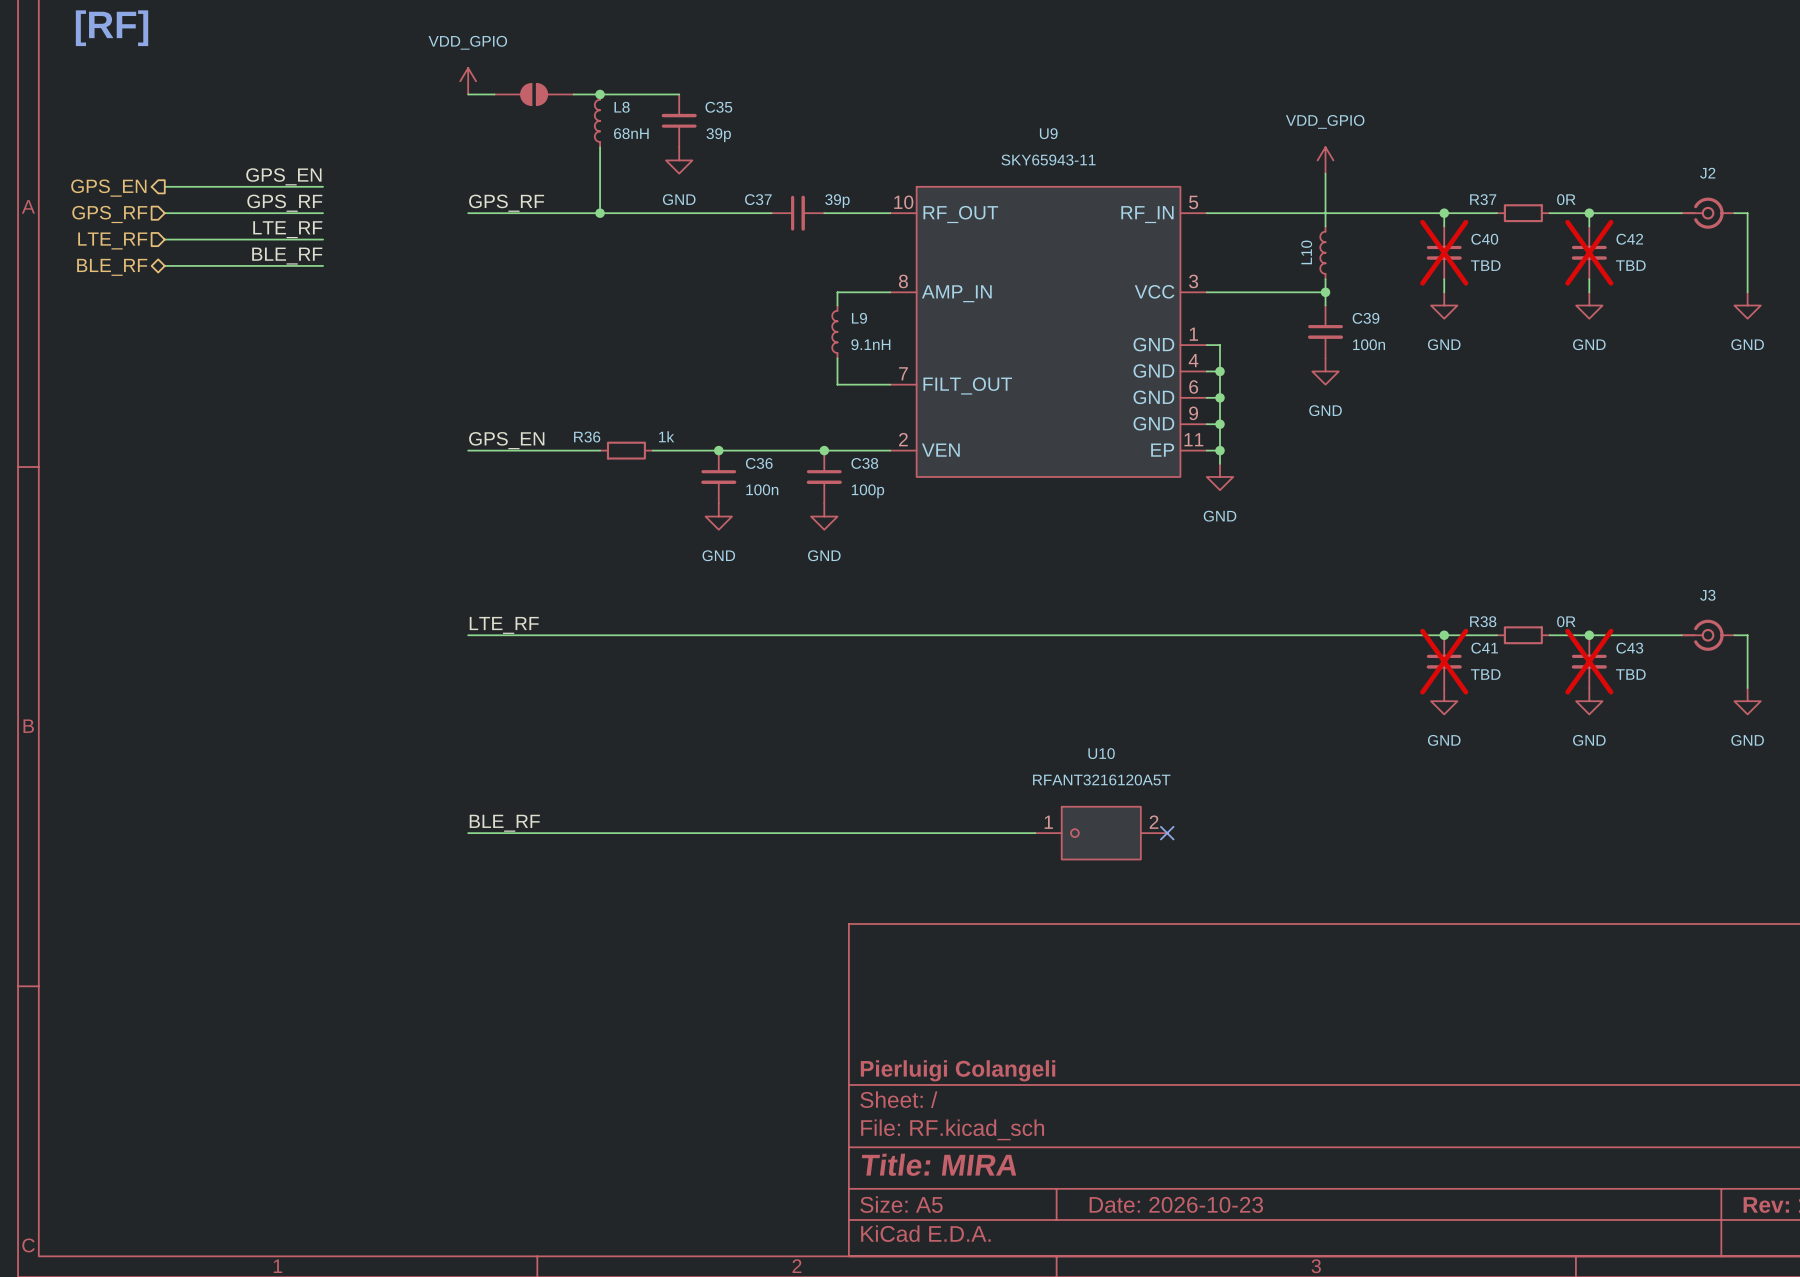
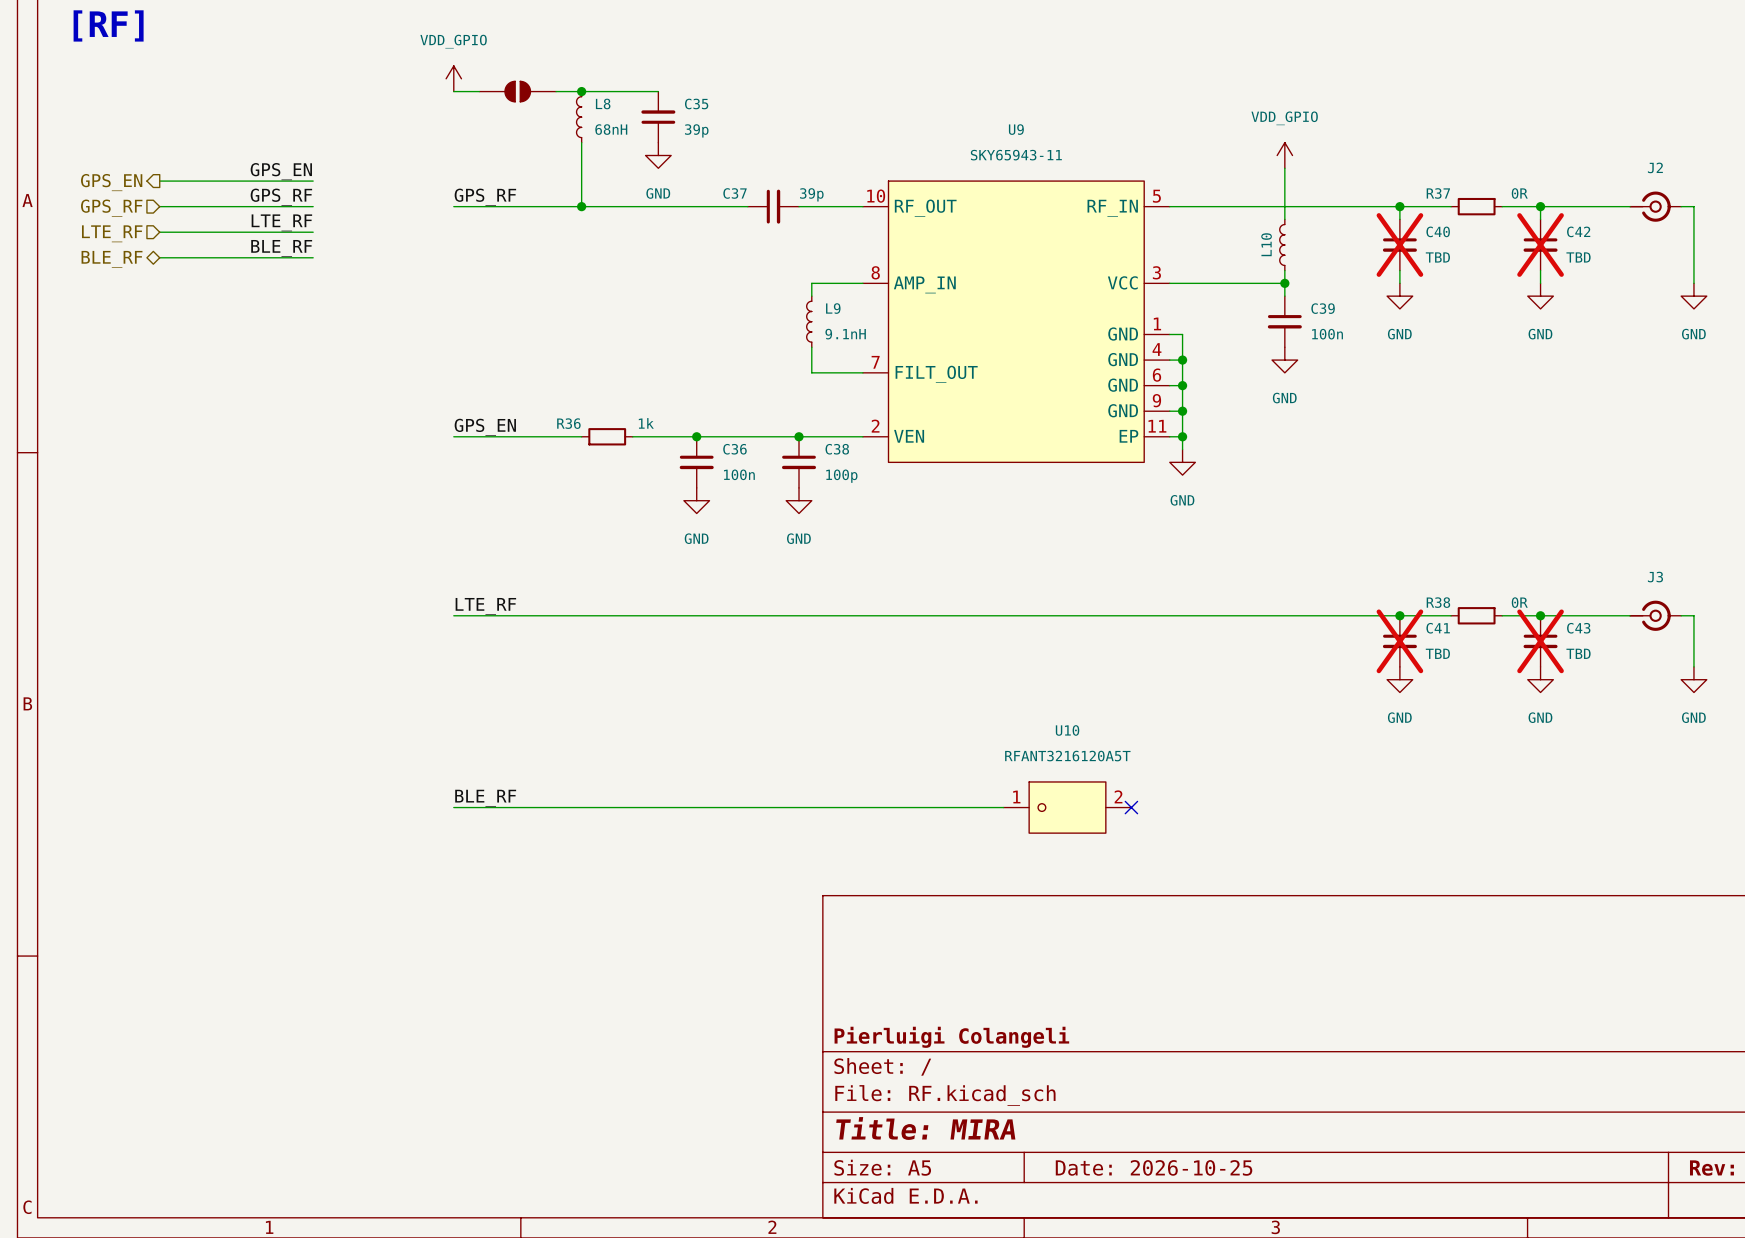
title block: Date: 2026-10-23 (1176, 1204) -> Date: 2026-10-25 (1154, 1167)

